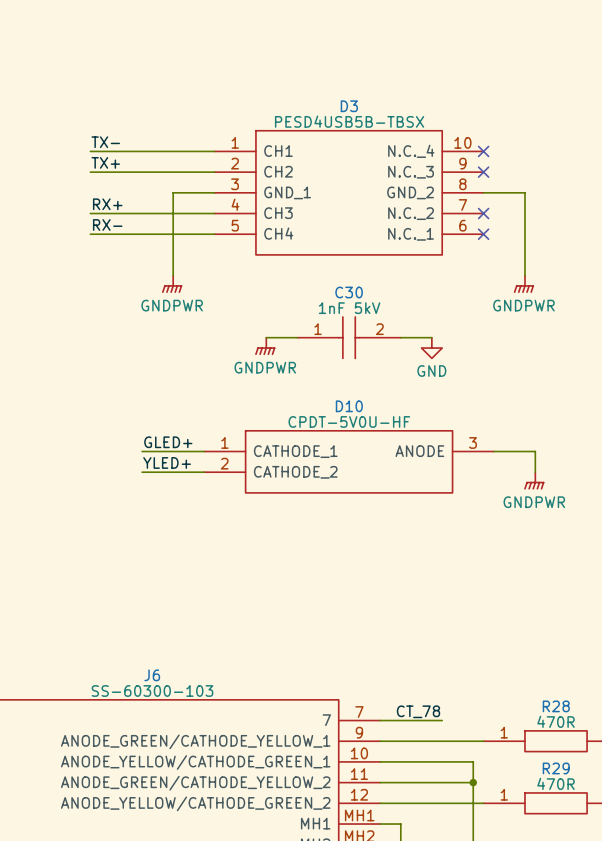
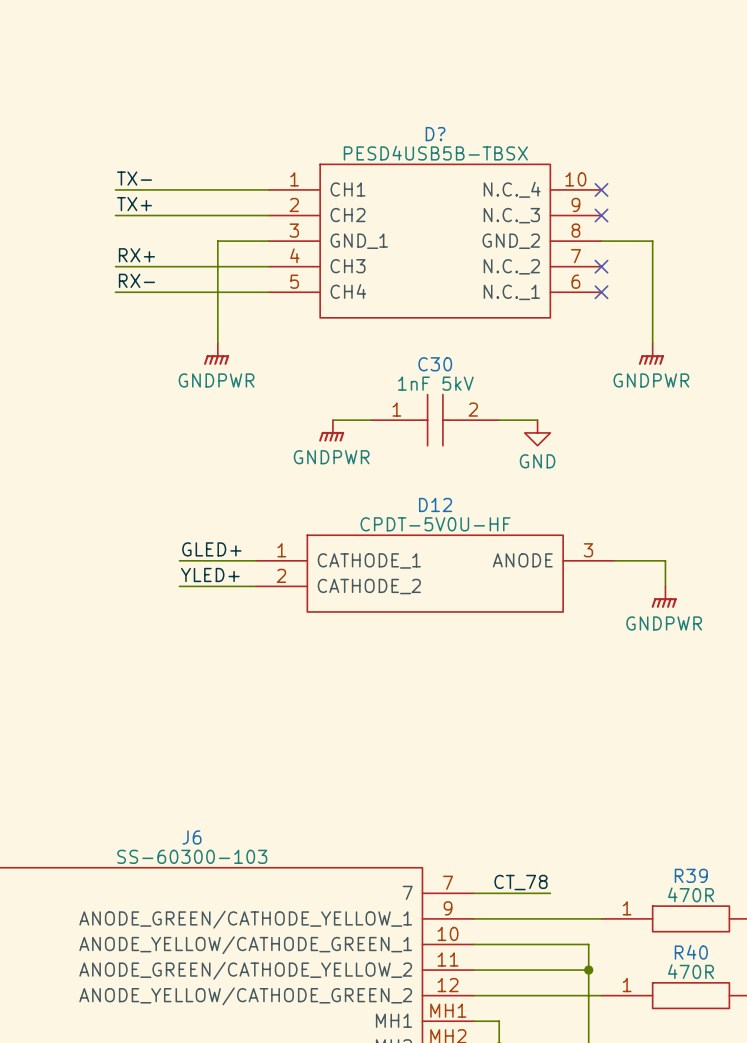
D3 name: D3 (349, 106) -> D? (435, 134)
D10 name: D10 (349, 406) -> D12 (435, 504)
R28 name: R28 (556, 706) -> R39 (691, 875)
R29 name: R29 (556, 768) -> R40 (691, 952)

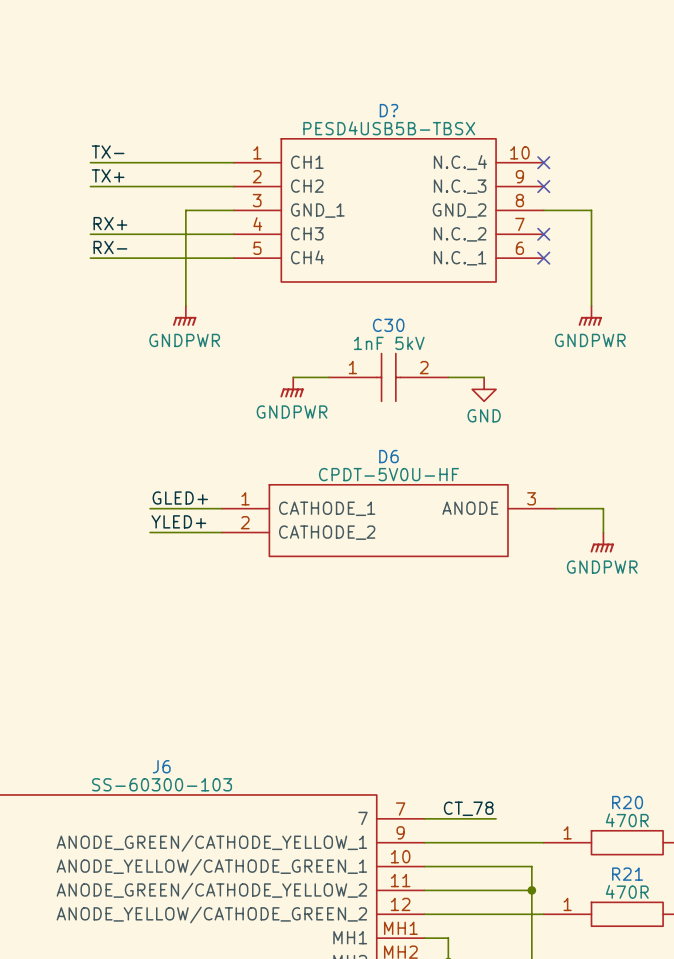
D12 name: D12 (435, 504) -> D6 (388, 456)
R39 name: R39 (691, 875) -> R20 (627, 802)
R40 name: R40 (691, 952) -> R21 (627, 874)

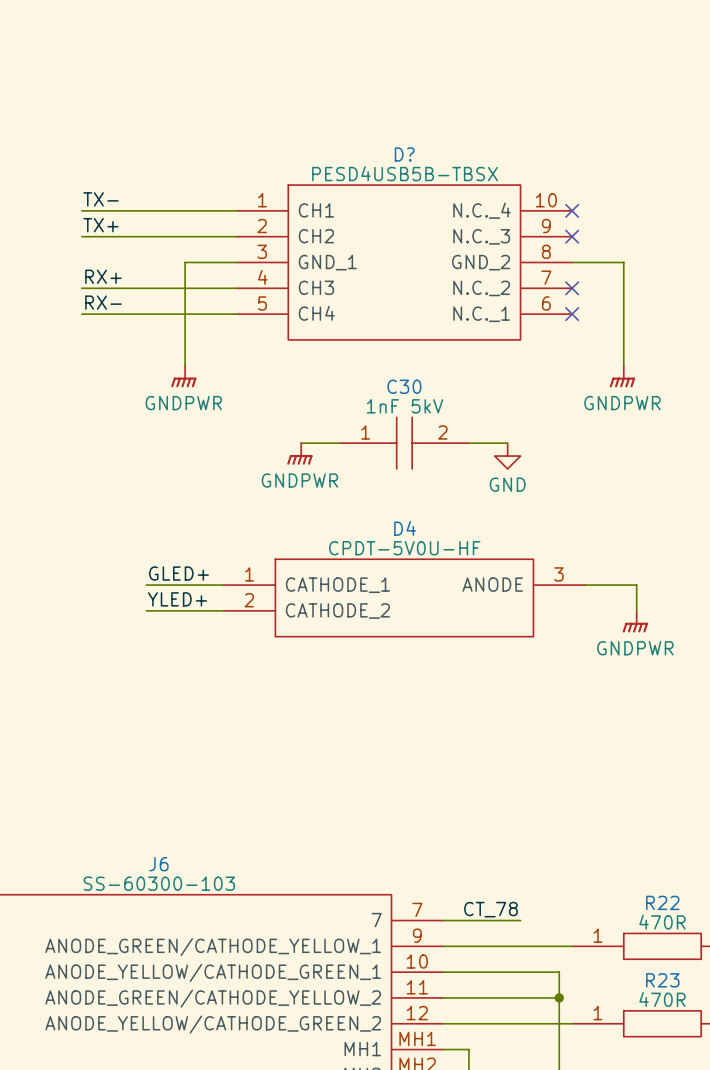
D6 name: D6 (388, 456) -> D4 (405, 528)
R20 name: R20 (627, 802) -> R22 (662, 902)
R21 name: R21 (627, 874) -> R23 (662, 980)

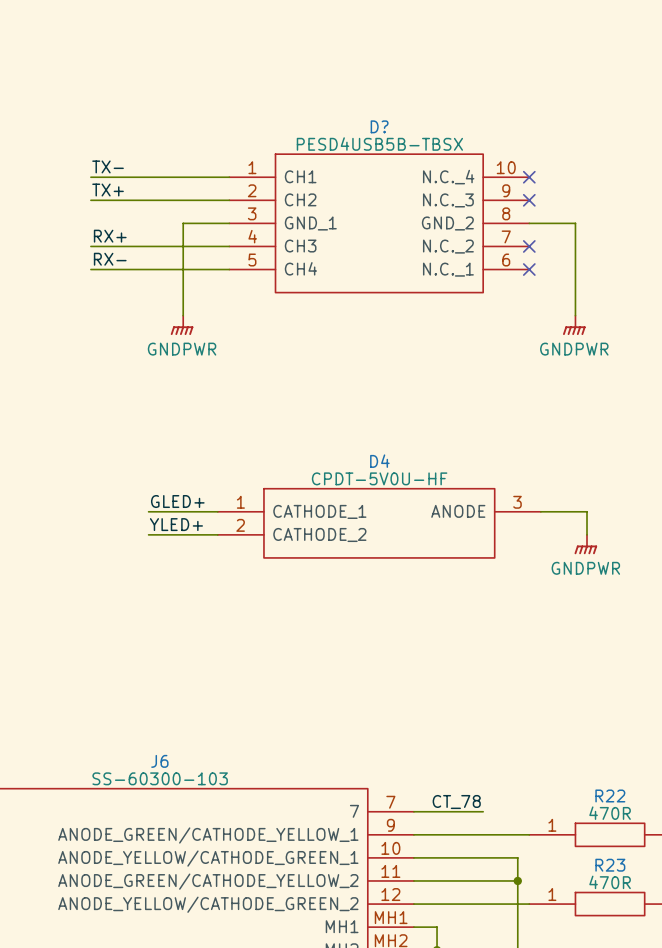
wire: (301, 443) (339, 443) -> none
C30: 1nF 5kV (404, 443) -> none
wire: (468, 443) (507, 443) -> none
power symbol: GNDPWR (299, 453) -> none
power symbol: GND (507, 456) -> none

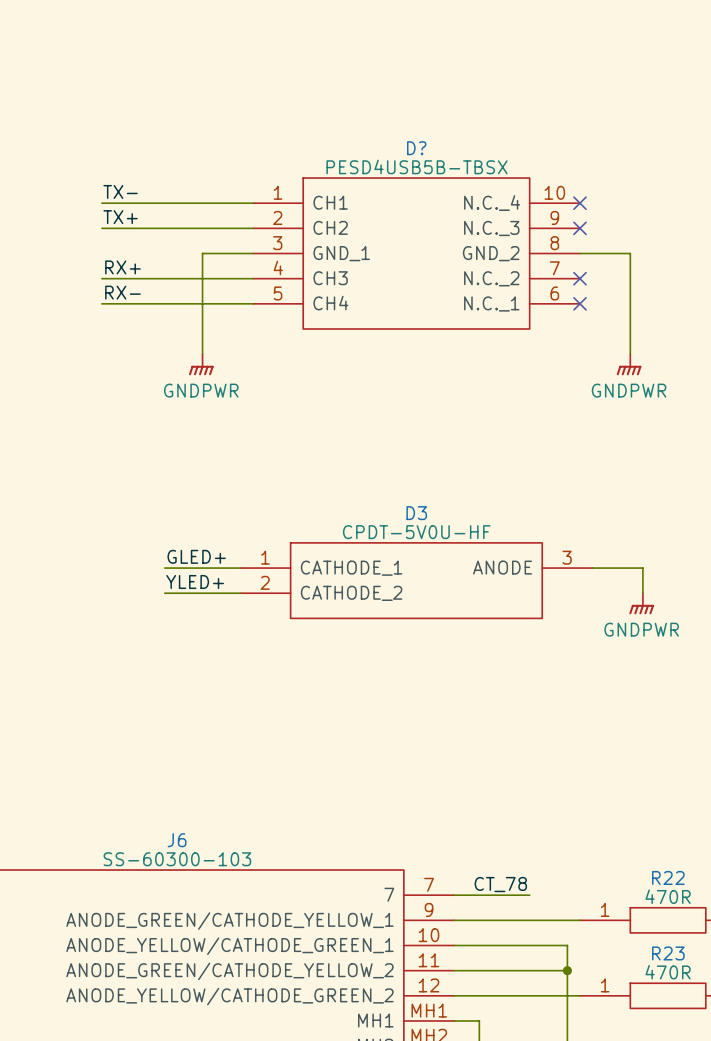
D4 name: D4 (379, 461) -> D3 (416, 513)

